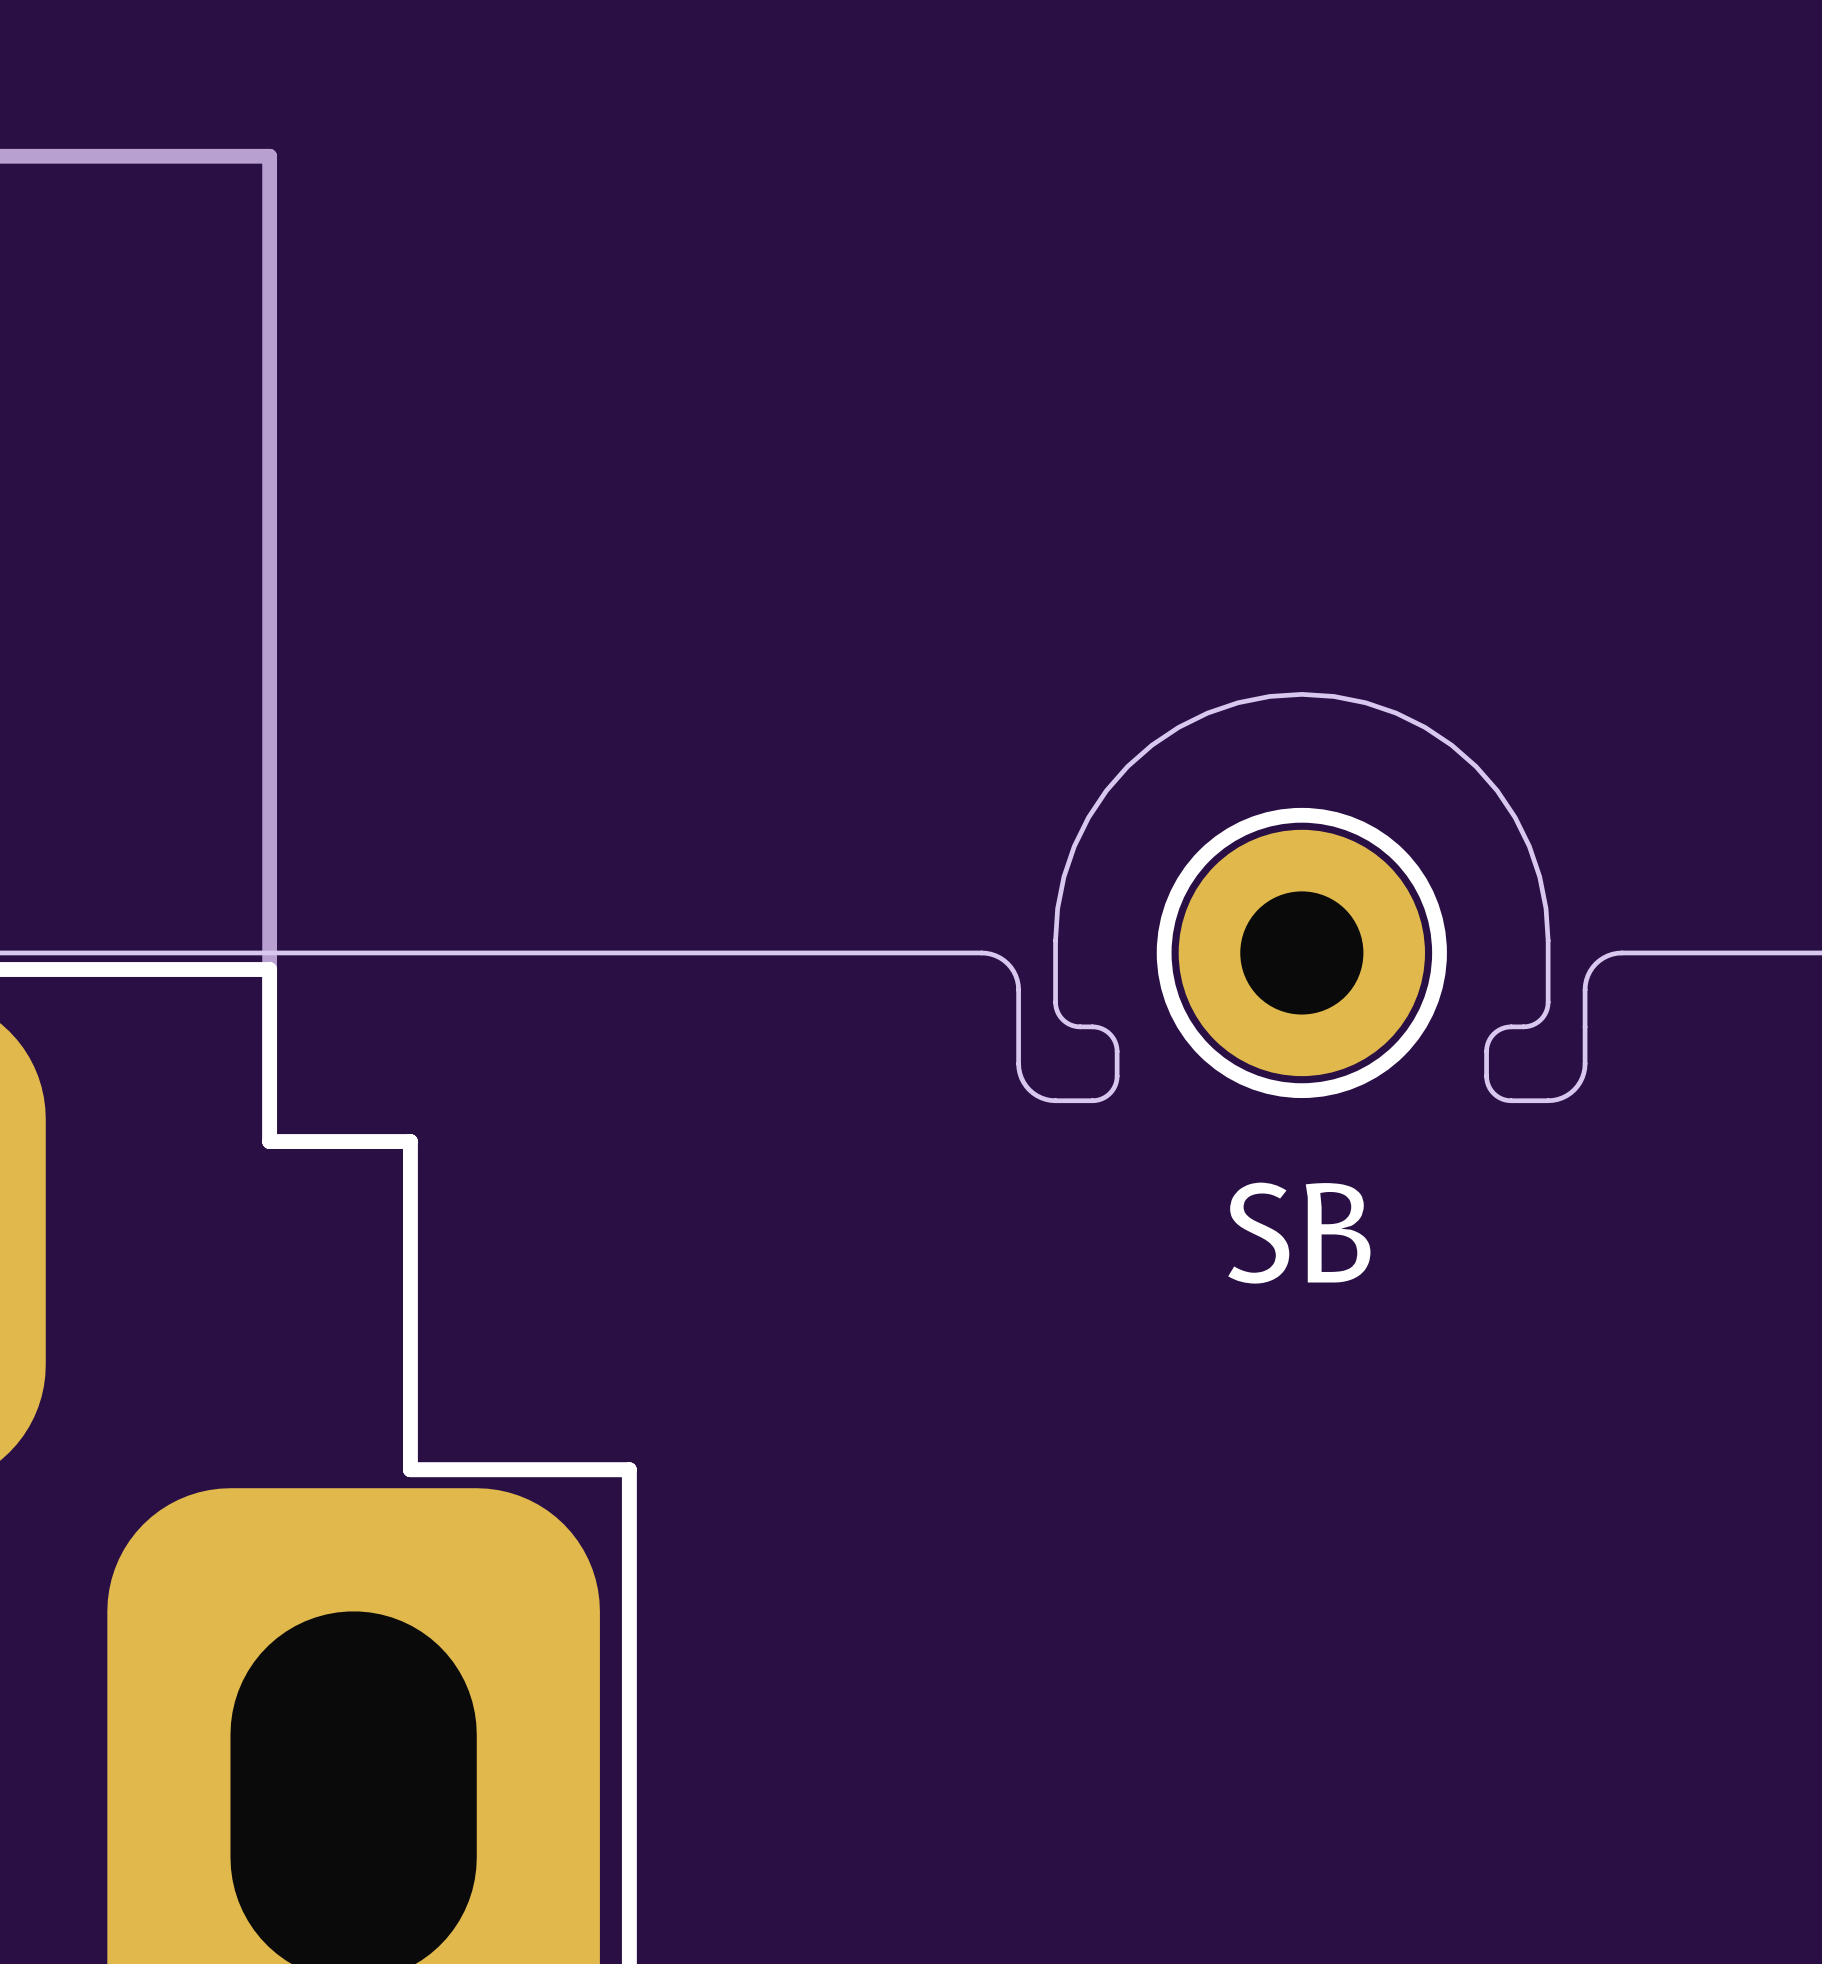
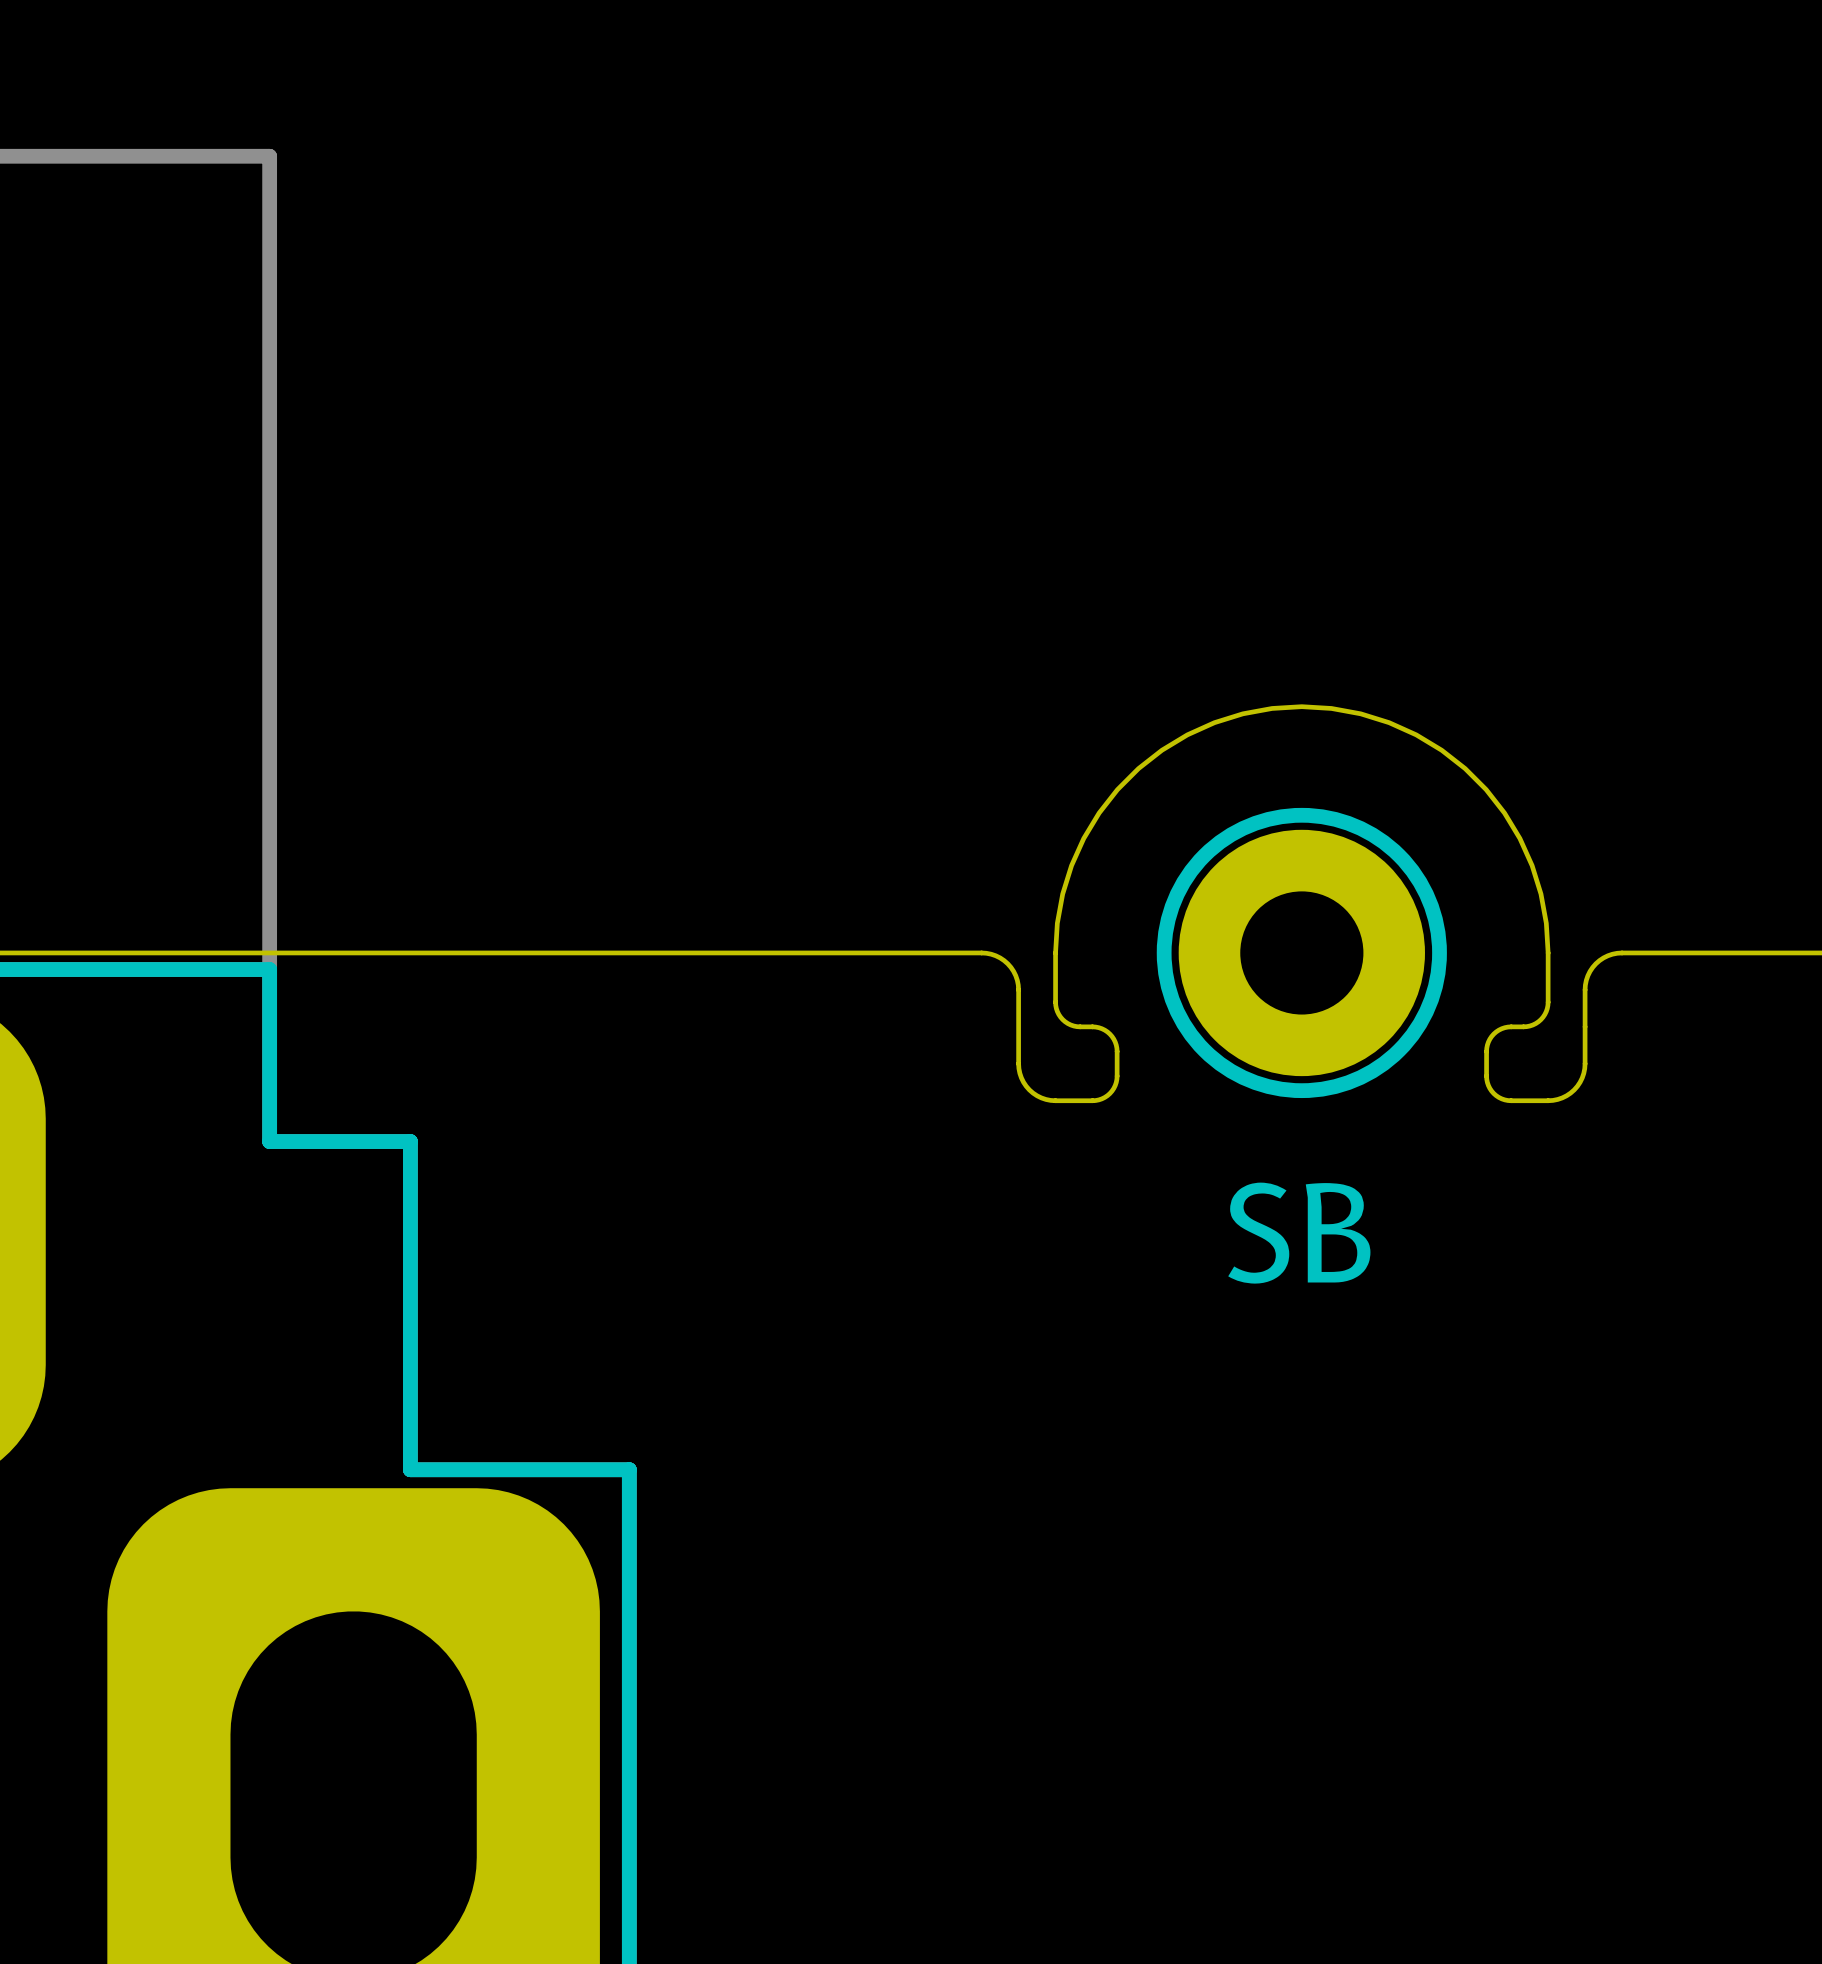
board edge: (1055, 952) (1057, 908) (1063, 876) (1074, 846) (1088, 817) (1106, 790) (1127, 766) (1151, 745) (1178, 727) (1207, 713) (1238, 702) (1269, 696) (1301, 694) (1333, 696) (1365, 702) (1396, 713) (1424, 727) (1451, 745) (1475, 766) (1497, 790) (1515, 817) (1529, 846) (1539, 876) (1546, 908) (1548, 952) -> (1055, 952) (1057, 923) (1062, 894) (1071, 865) (1083, 838) (1099, 813) (1117, 789) (1138, 768) (1161, 750) (1187, 734) (1214, 722) (1242, 713) (1272, 708) (1301, 706) (1331, 708) (1360, 713) (1389, 722) (1416, 734) (1441, 750) (1465, 768) (1486, 789) (1504, 813) (1519, 838) (1532, 865) (1540, 894) (1546, 923) (1548, 952)

